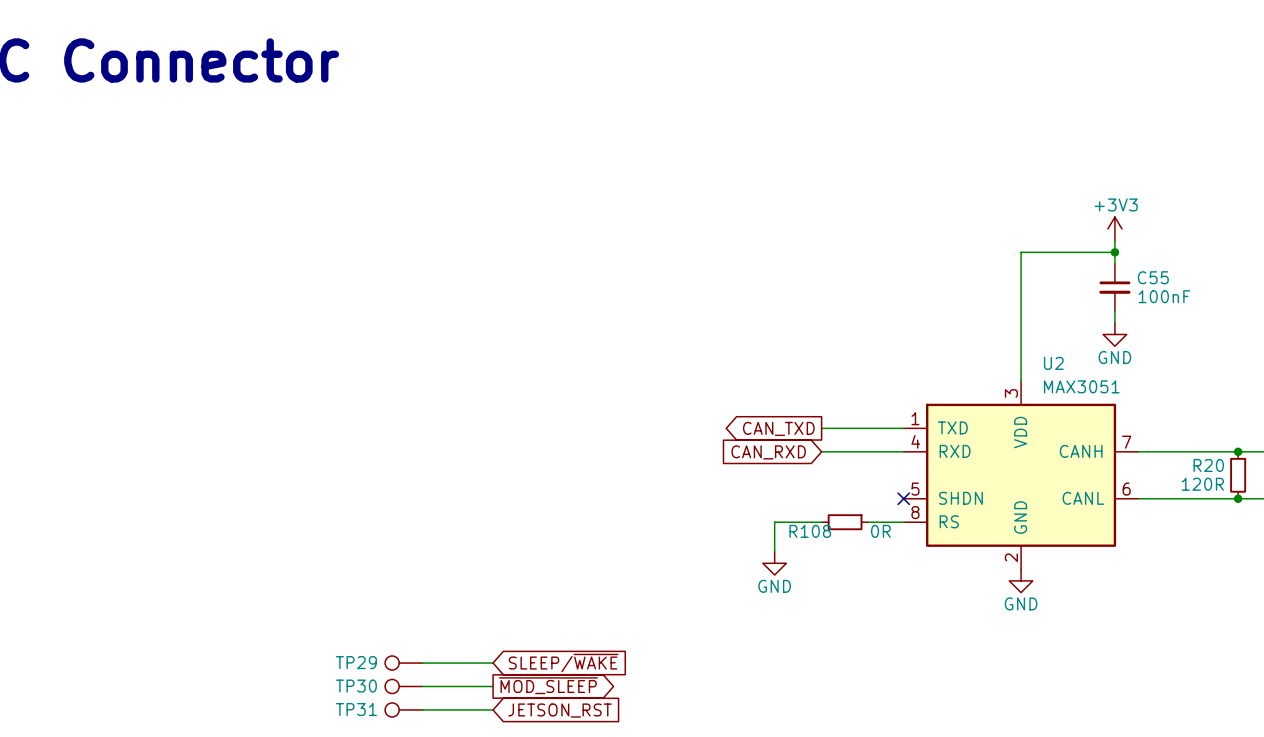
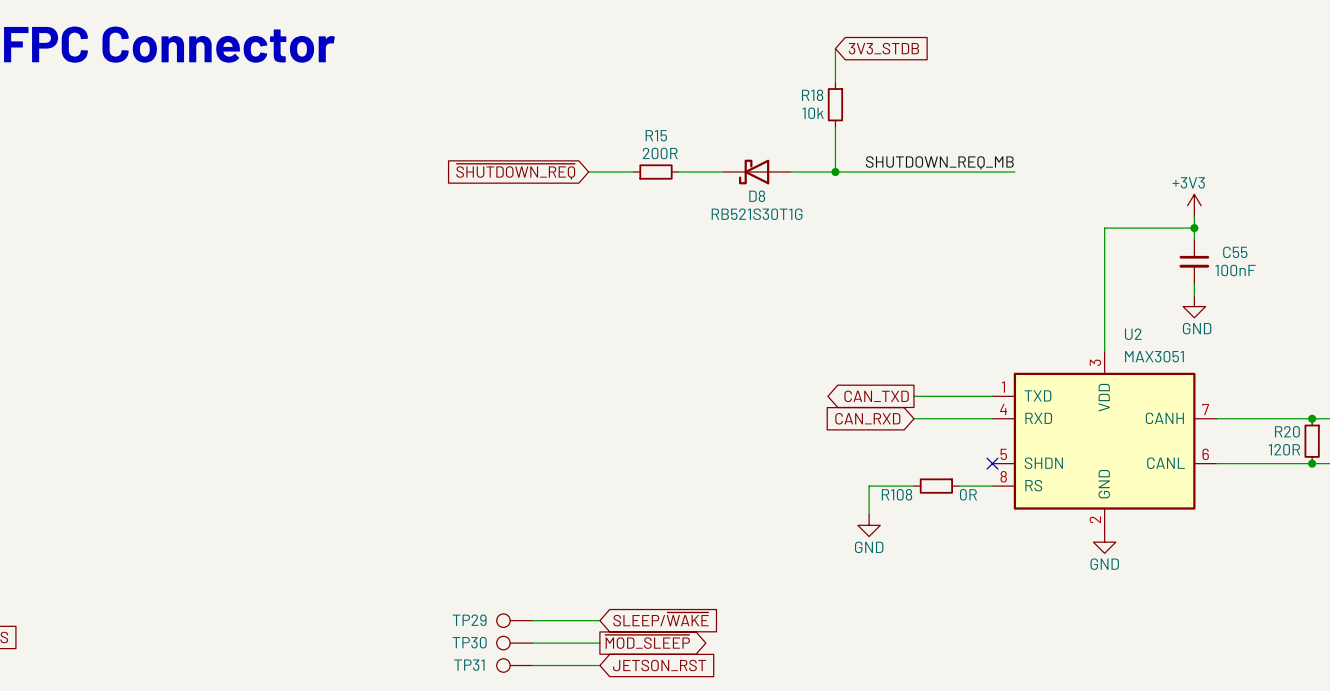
wire: none -> (835, 48) (835, 82)
global label: none -> 3V3_STDB (883, 48)
R18: none -> 10k (835, 104)
wire: none -> (835, 127) (835, 172)
label: none -> SHUTDOWN_REQ_MB (939, 162)
global label: none -> ~{SHUTDOWN_REQ} (515, 171)
wire: none -> (588, 172) (633, 172)
R15: none -> 200R (655, 172)
wire: none -> (678, 172) (723, 172)
D8: none -> RB521S30T1G (756, 172)
wire: none -> (790, 172) (1014, 172)
junction: none -> (835, 172)

